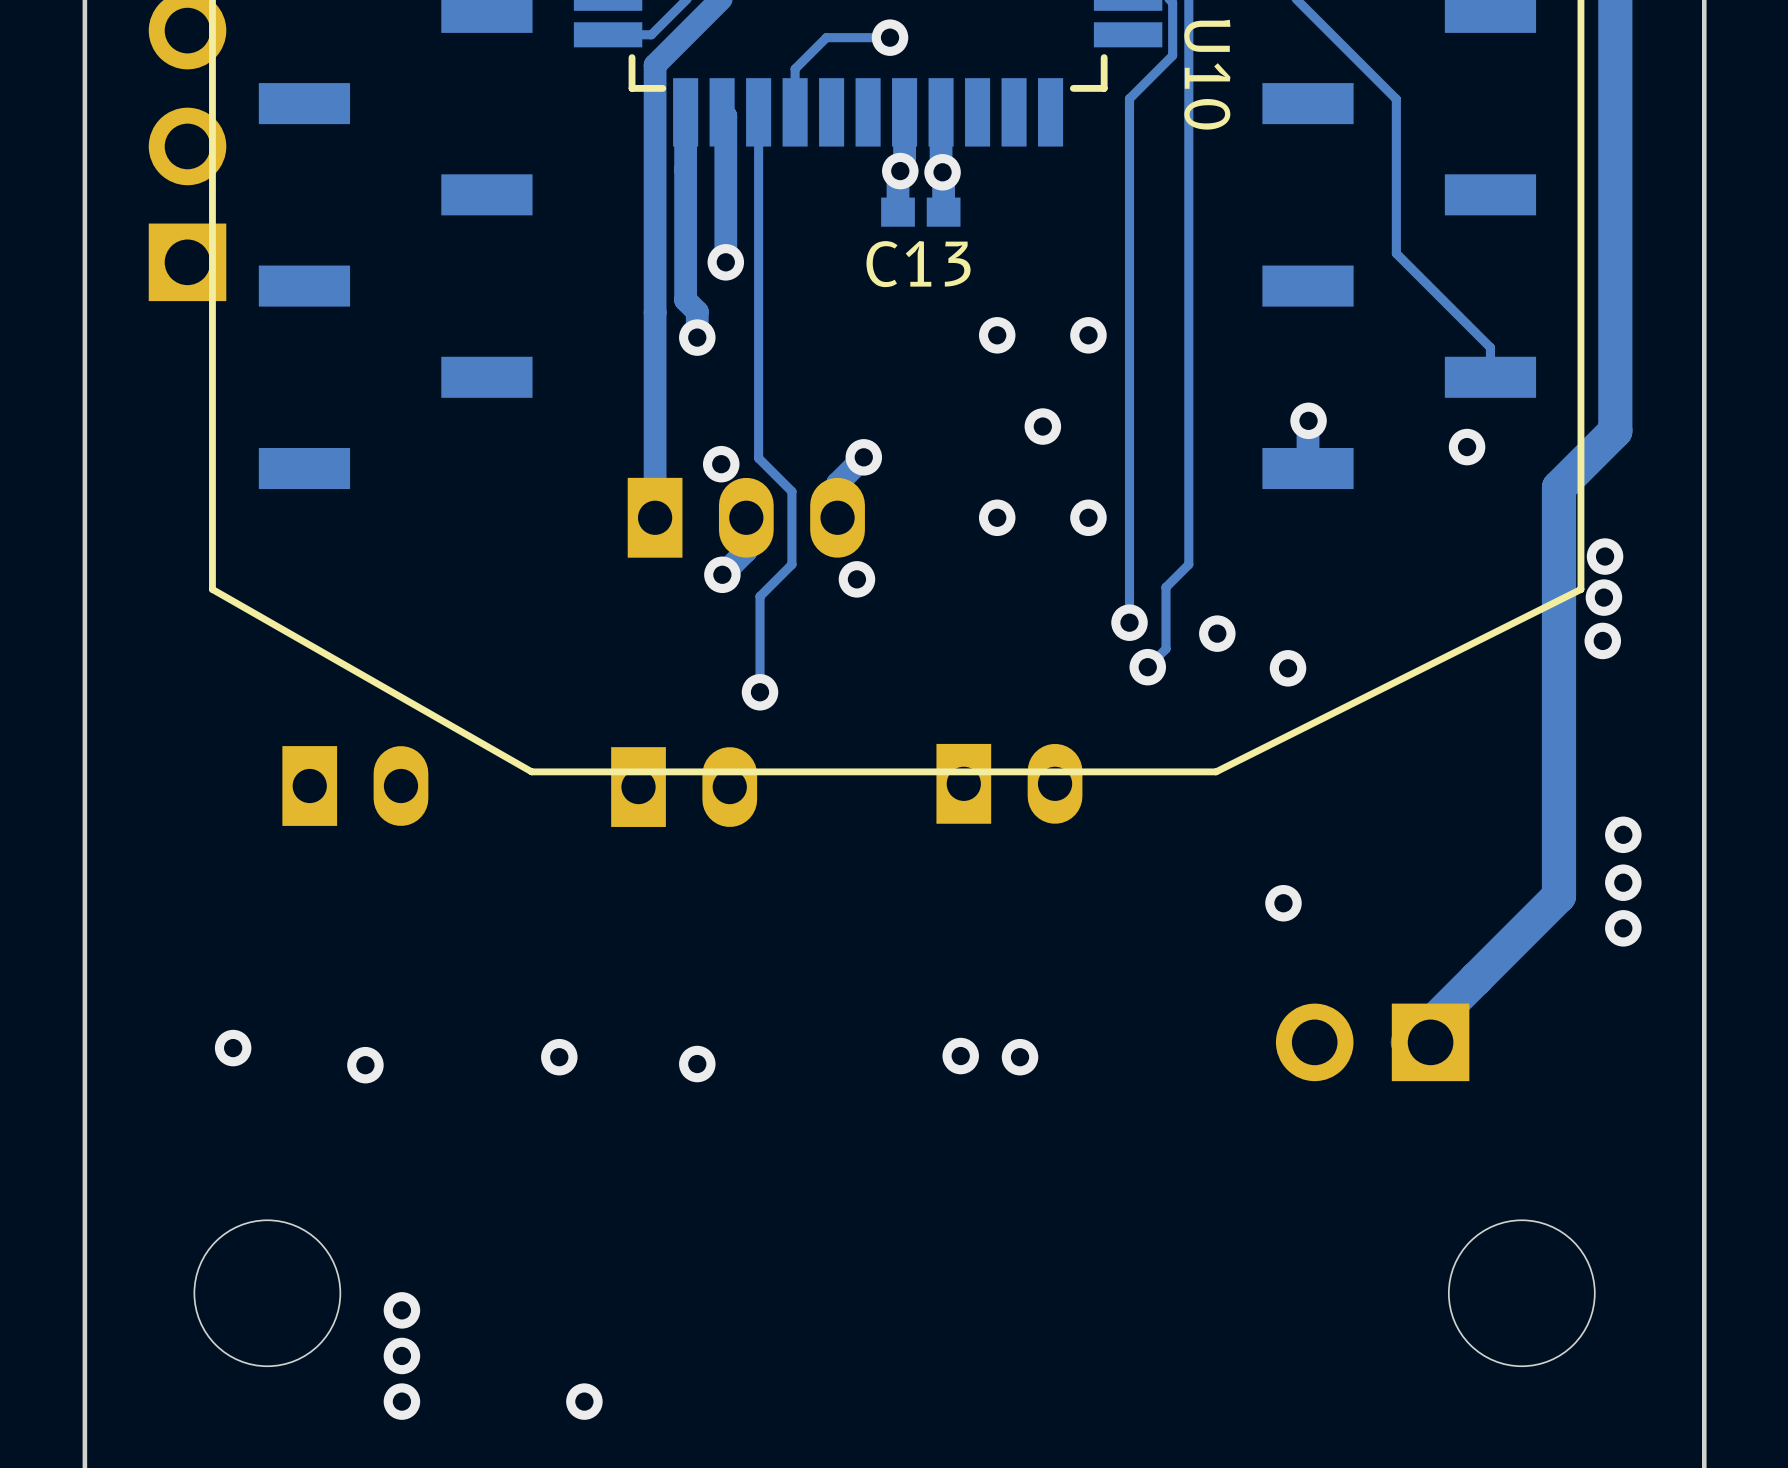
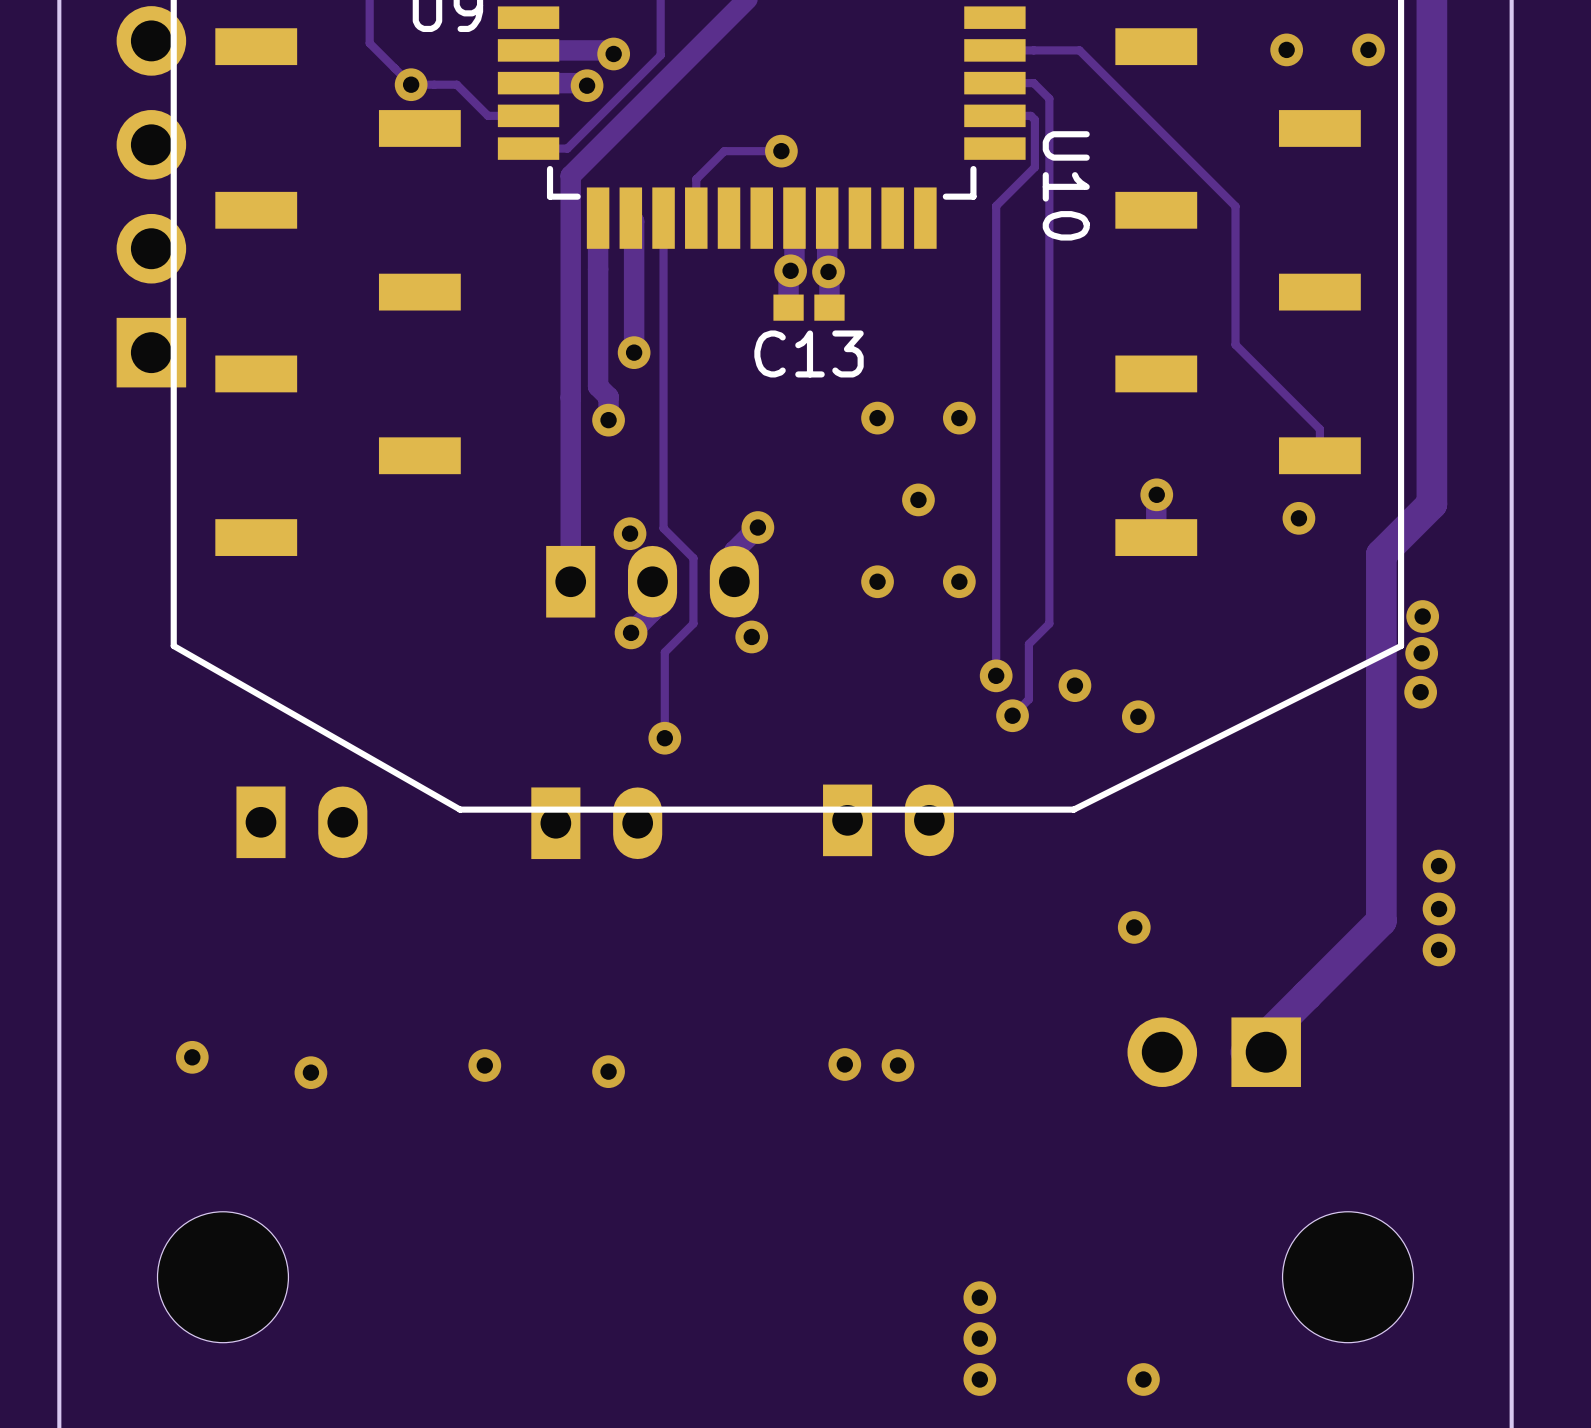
via: (401, 1310) -> none
via: none -> (979, 1297)
via: (401, 1355) -> none
via: none -> (979, 1338)
via: (401, 1401) -> none
via: (584, 1401) -> none
via: none -> (979, 1379)
via: none -> (1143, 1379)

